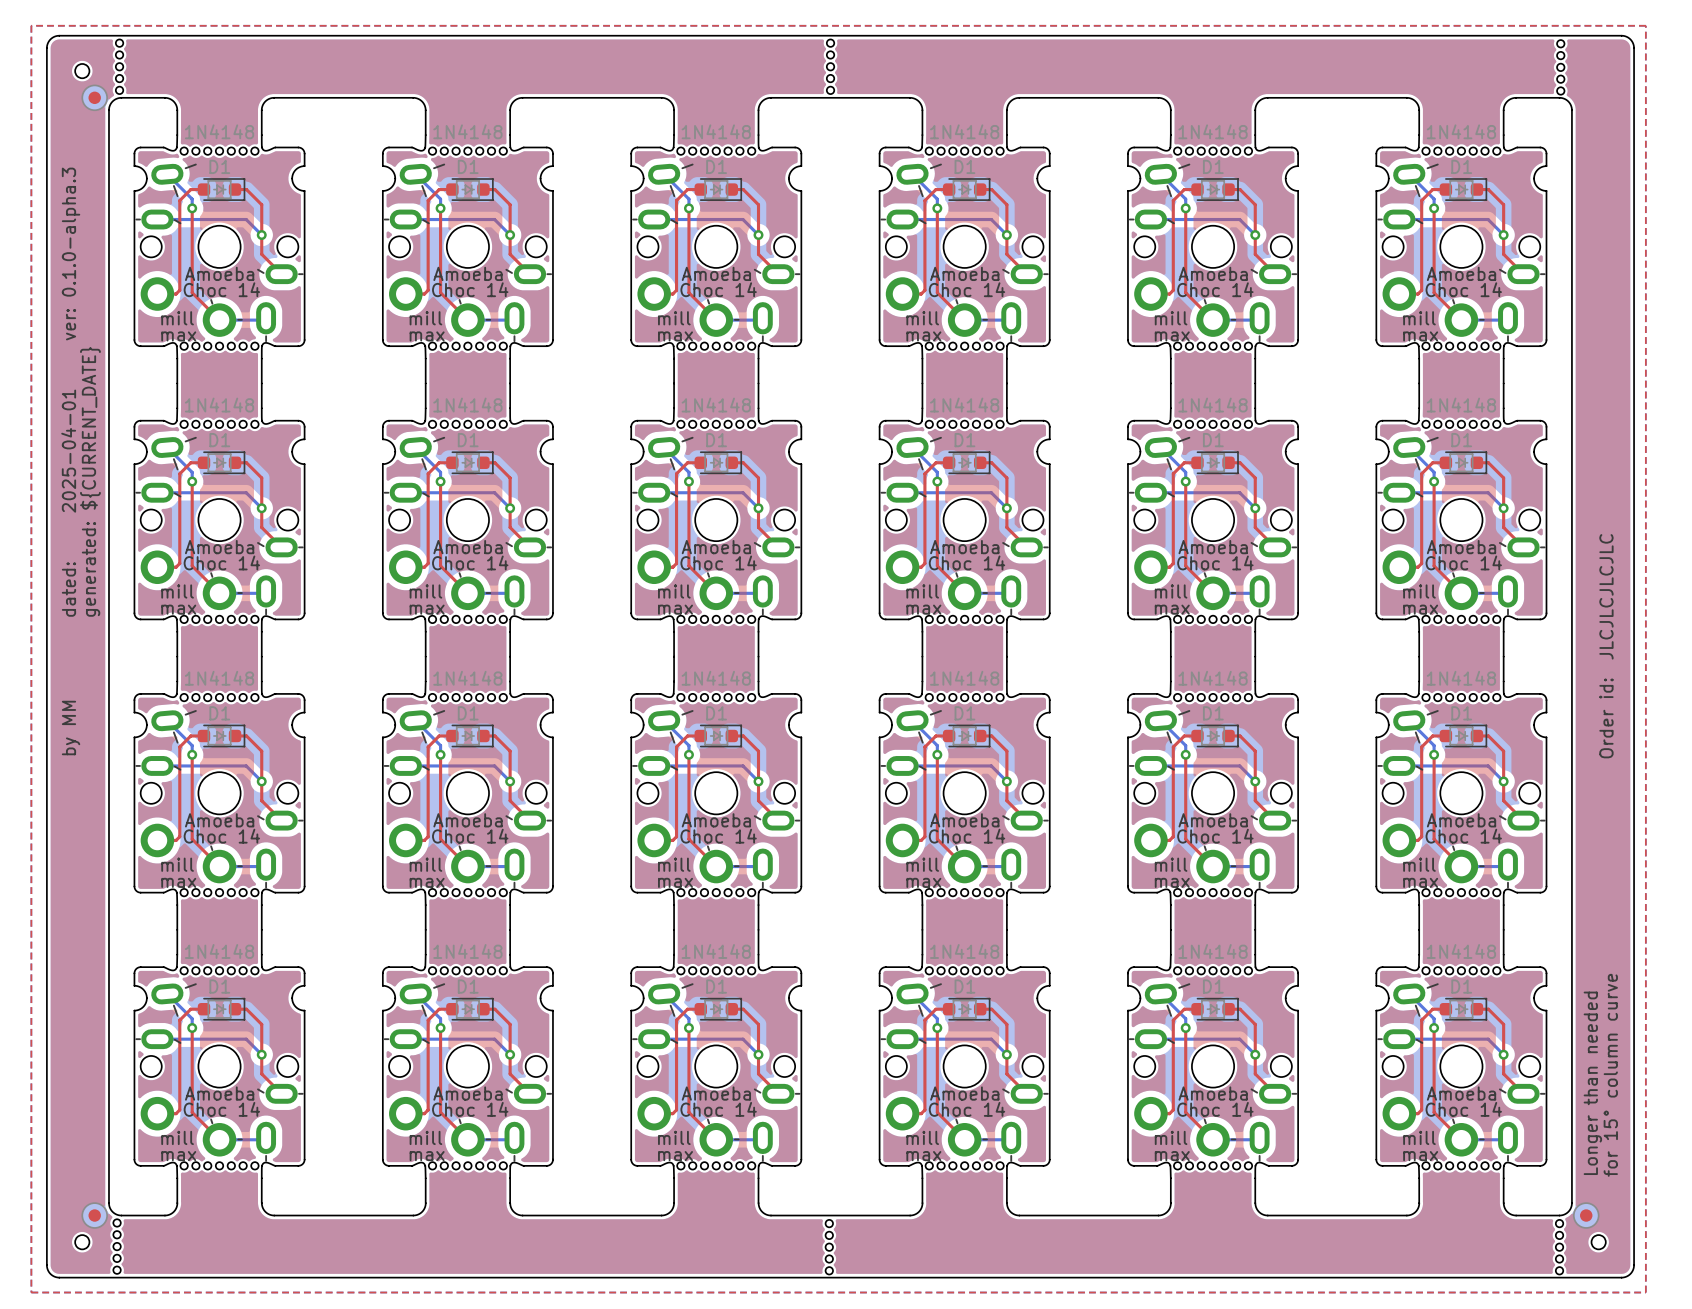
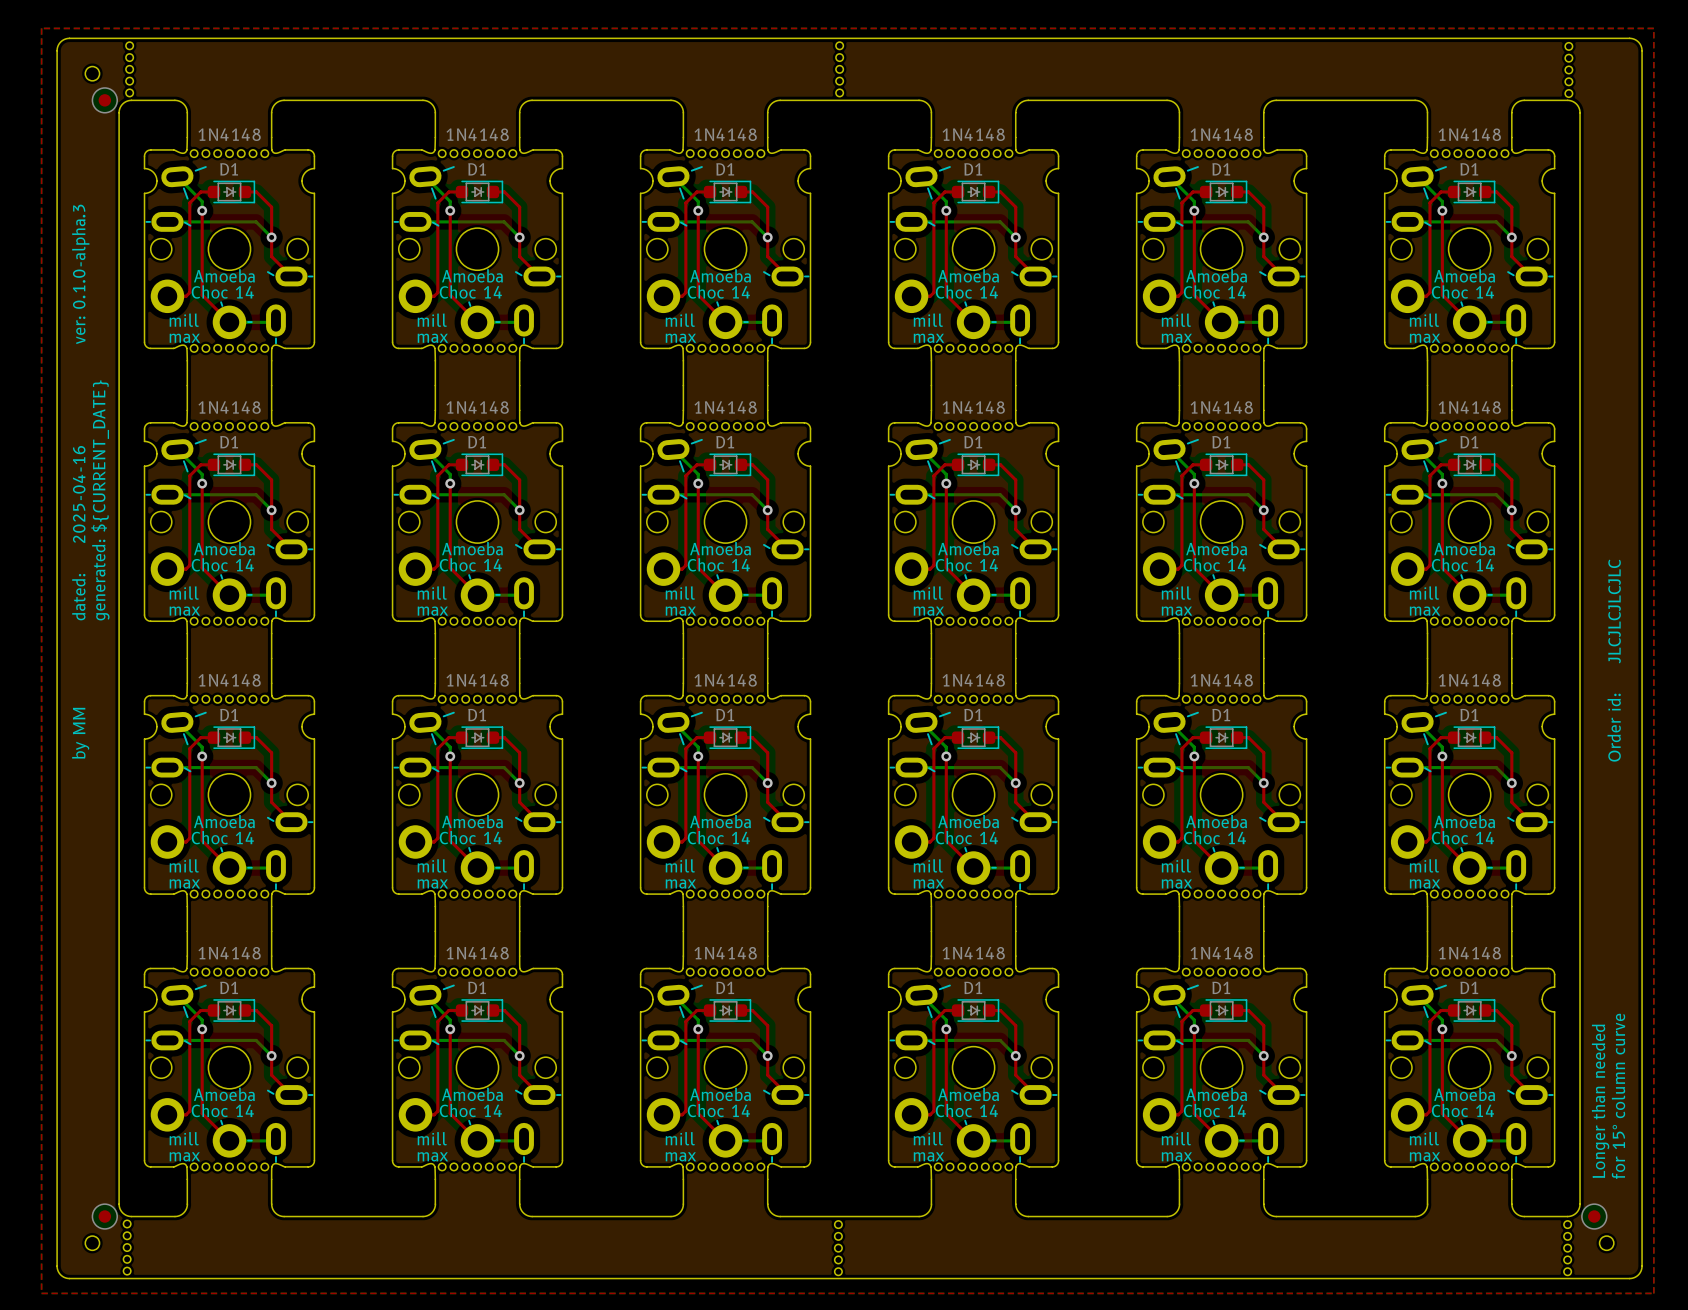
text: dated: 2025-04-01 (68, 503) -> dated: 2025-04-16 (78, 533)

